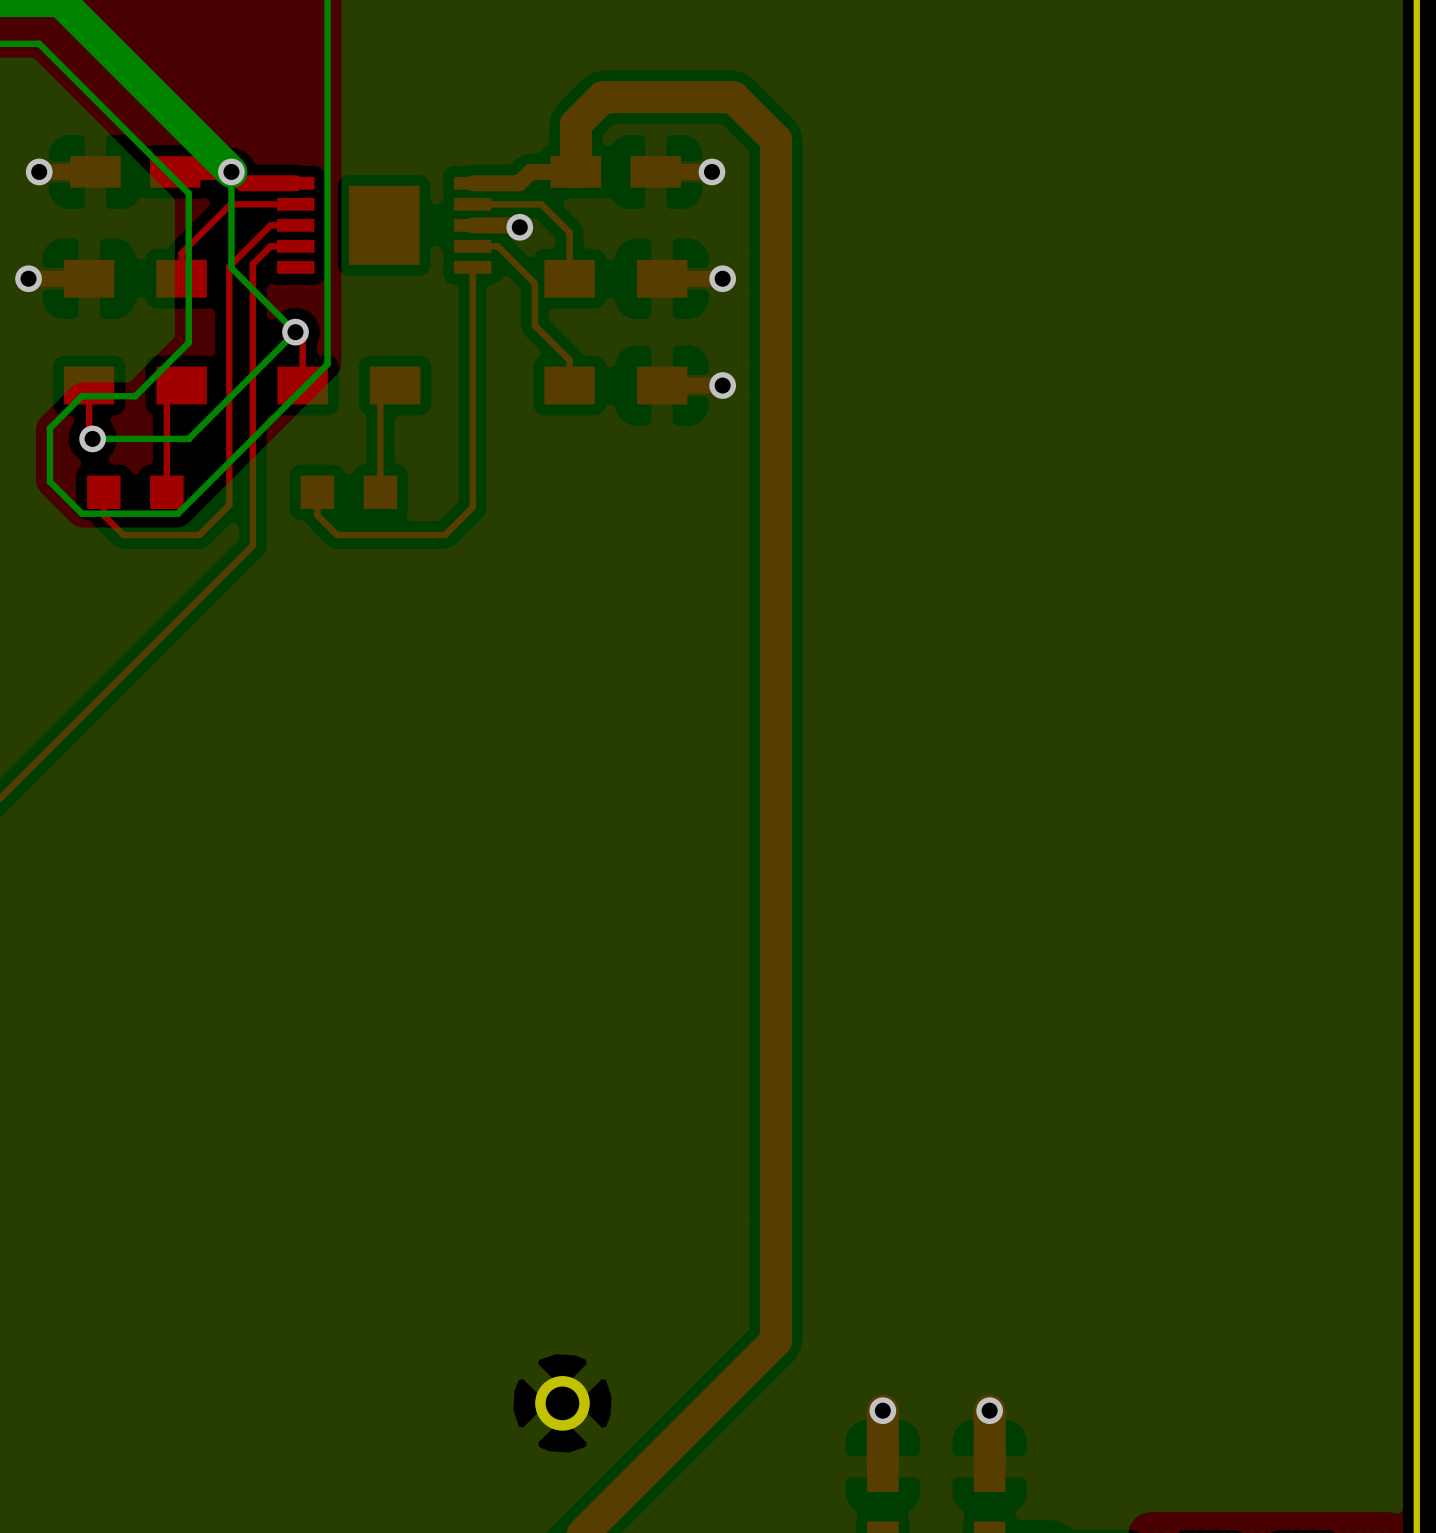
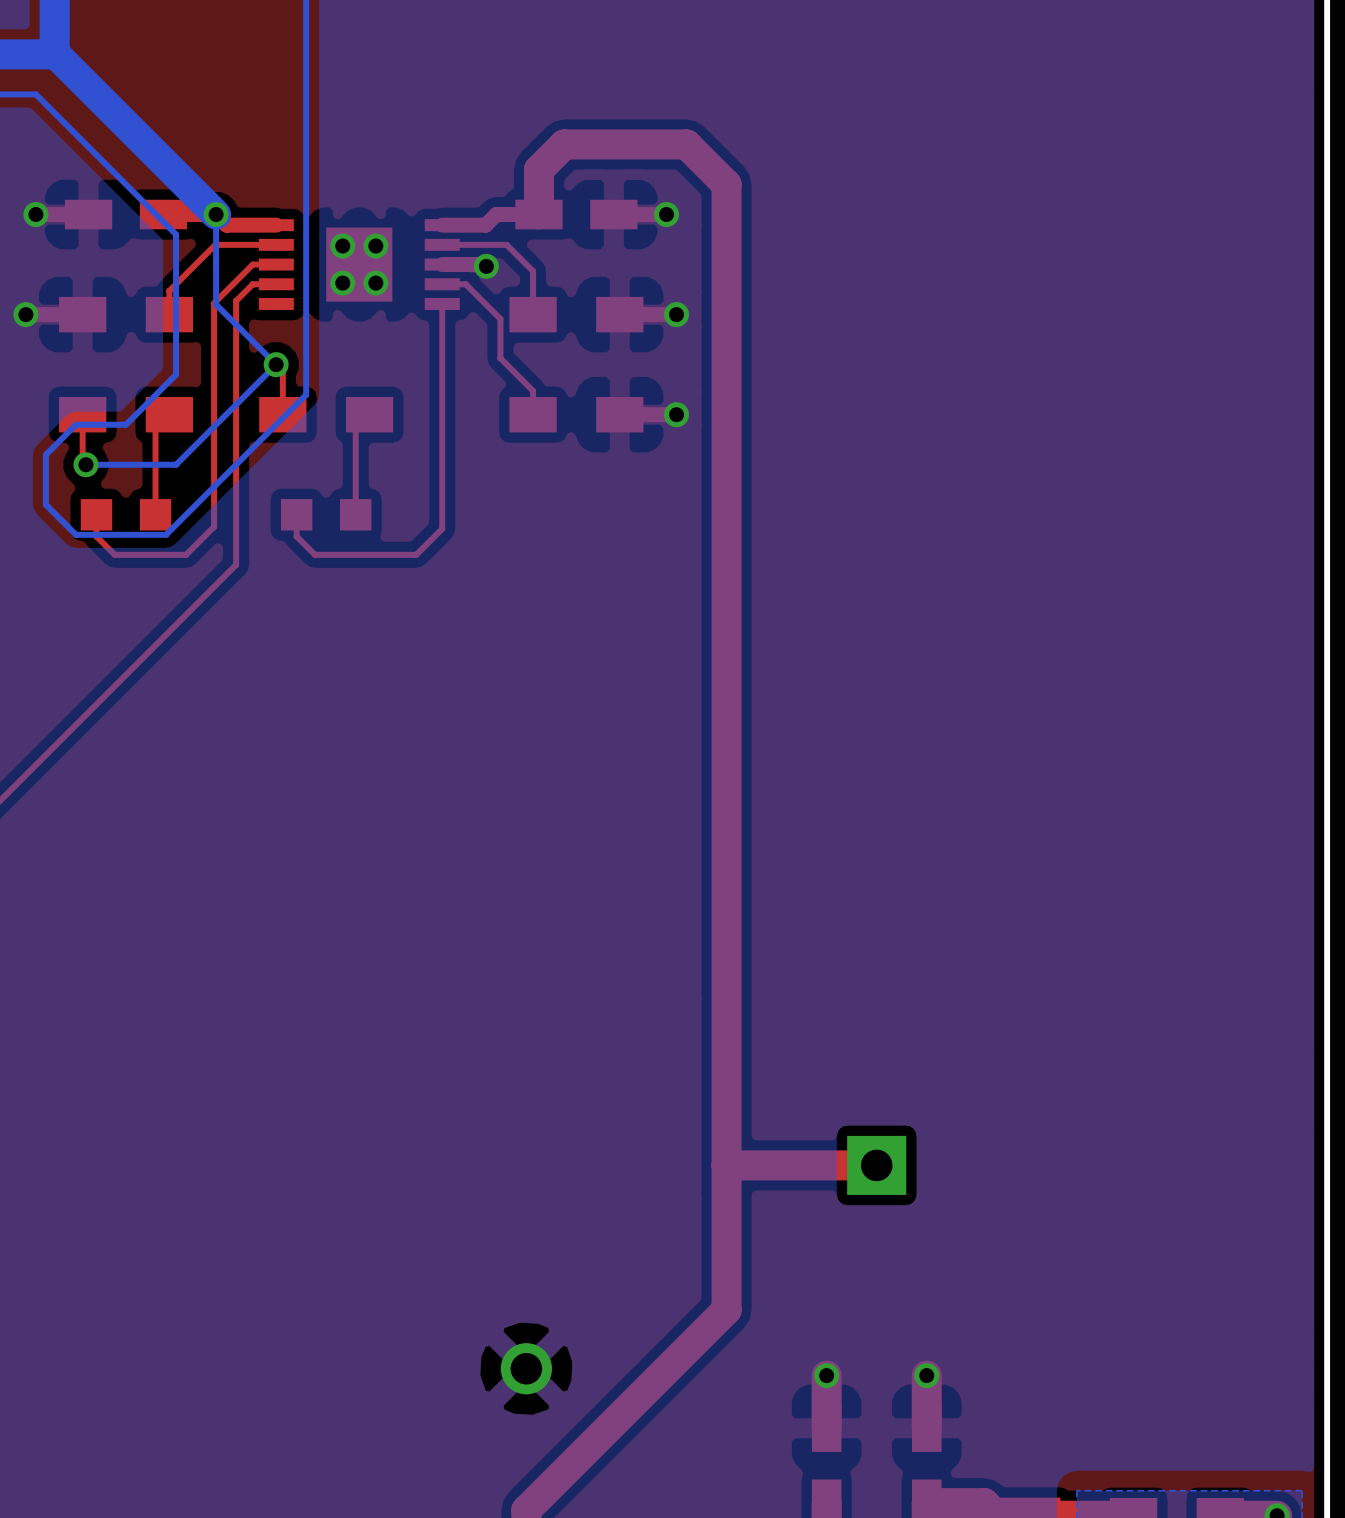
via: none -> (342, 246)
via: none -> (375, 246)
via: none -> (342, 283)
via: none -> (375, 283)
top track: none -> (876, 1165) (726, 1165)
part: none -> (876, 1165)

